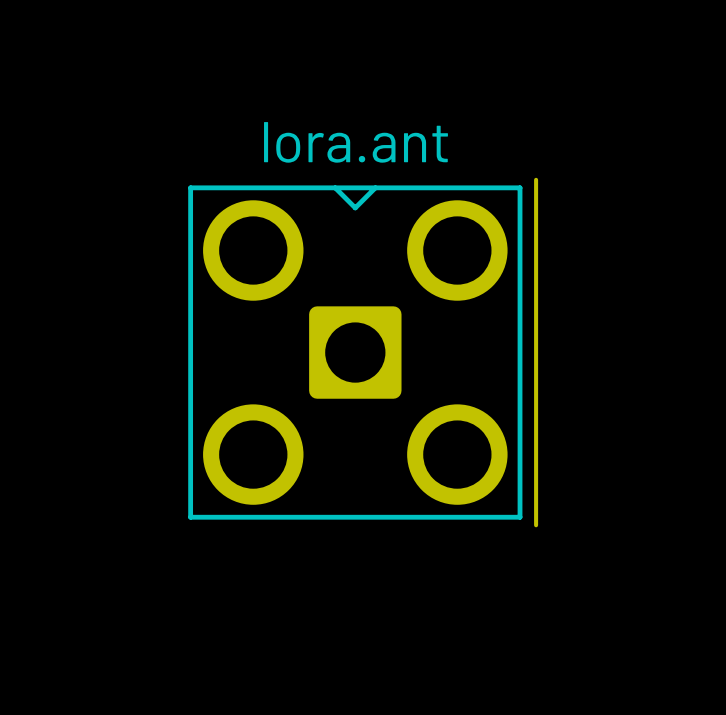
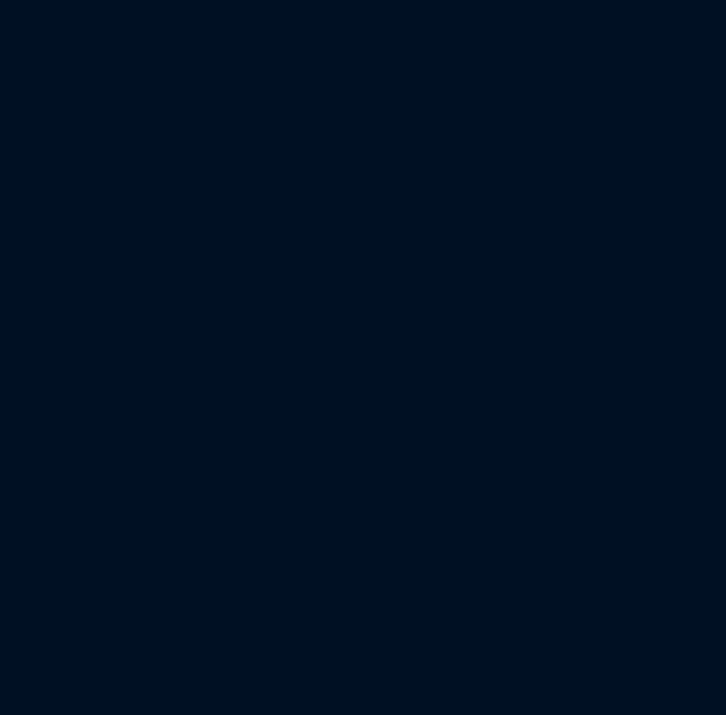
lora.ant: (363, 352) -> none

